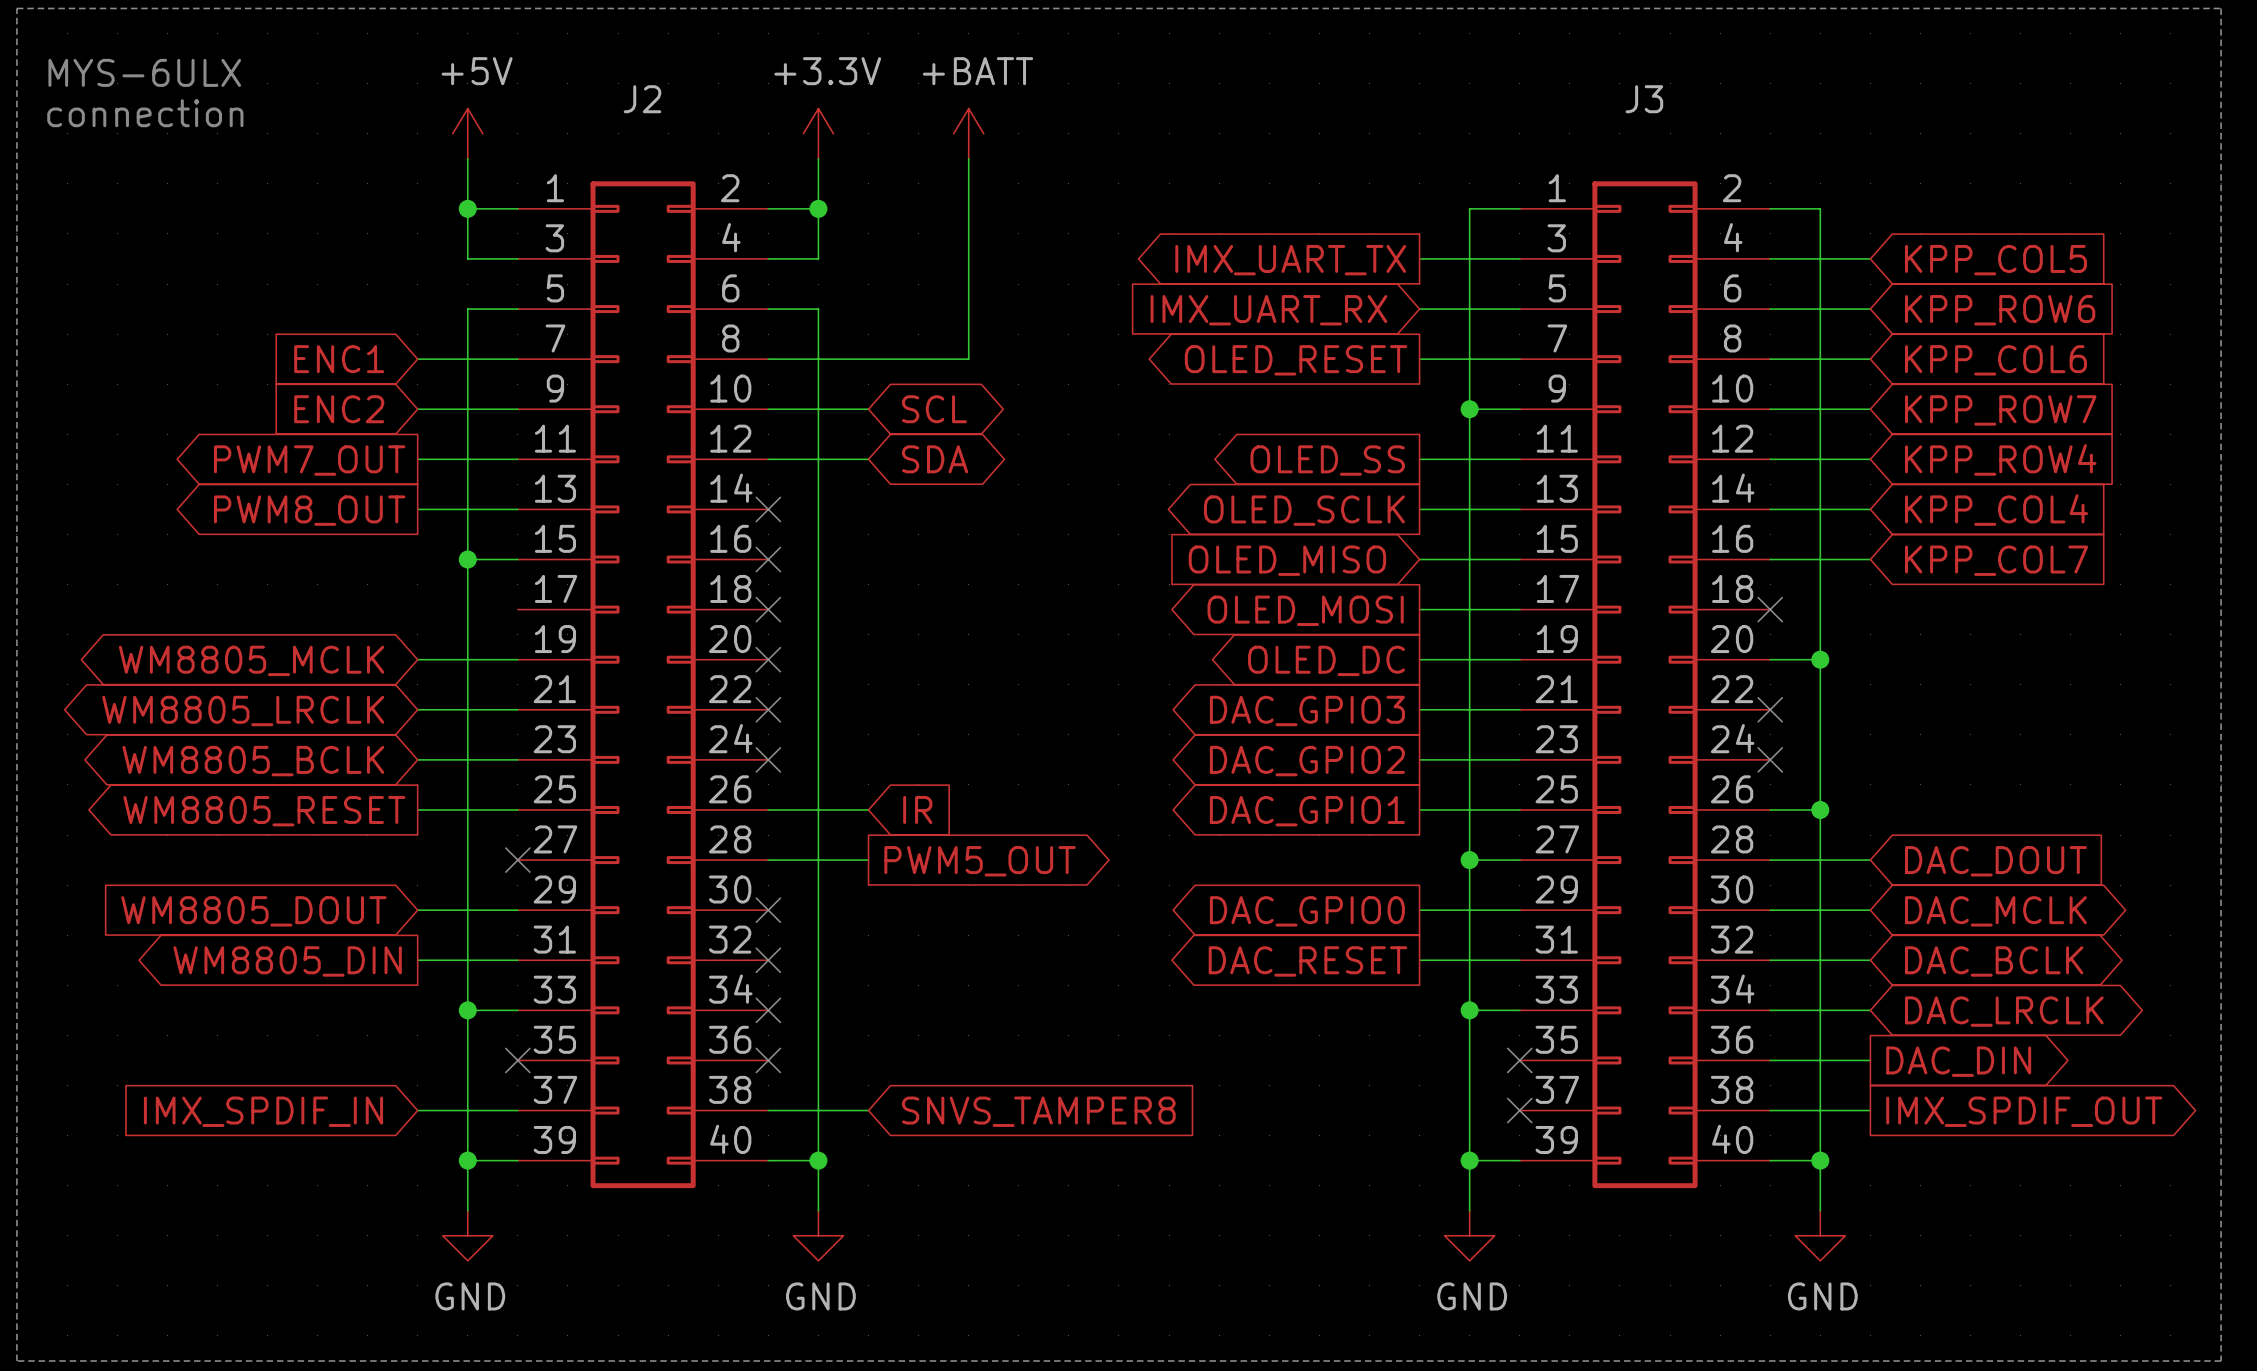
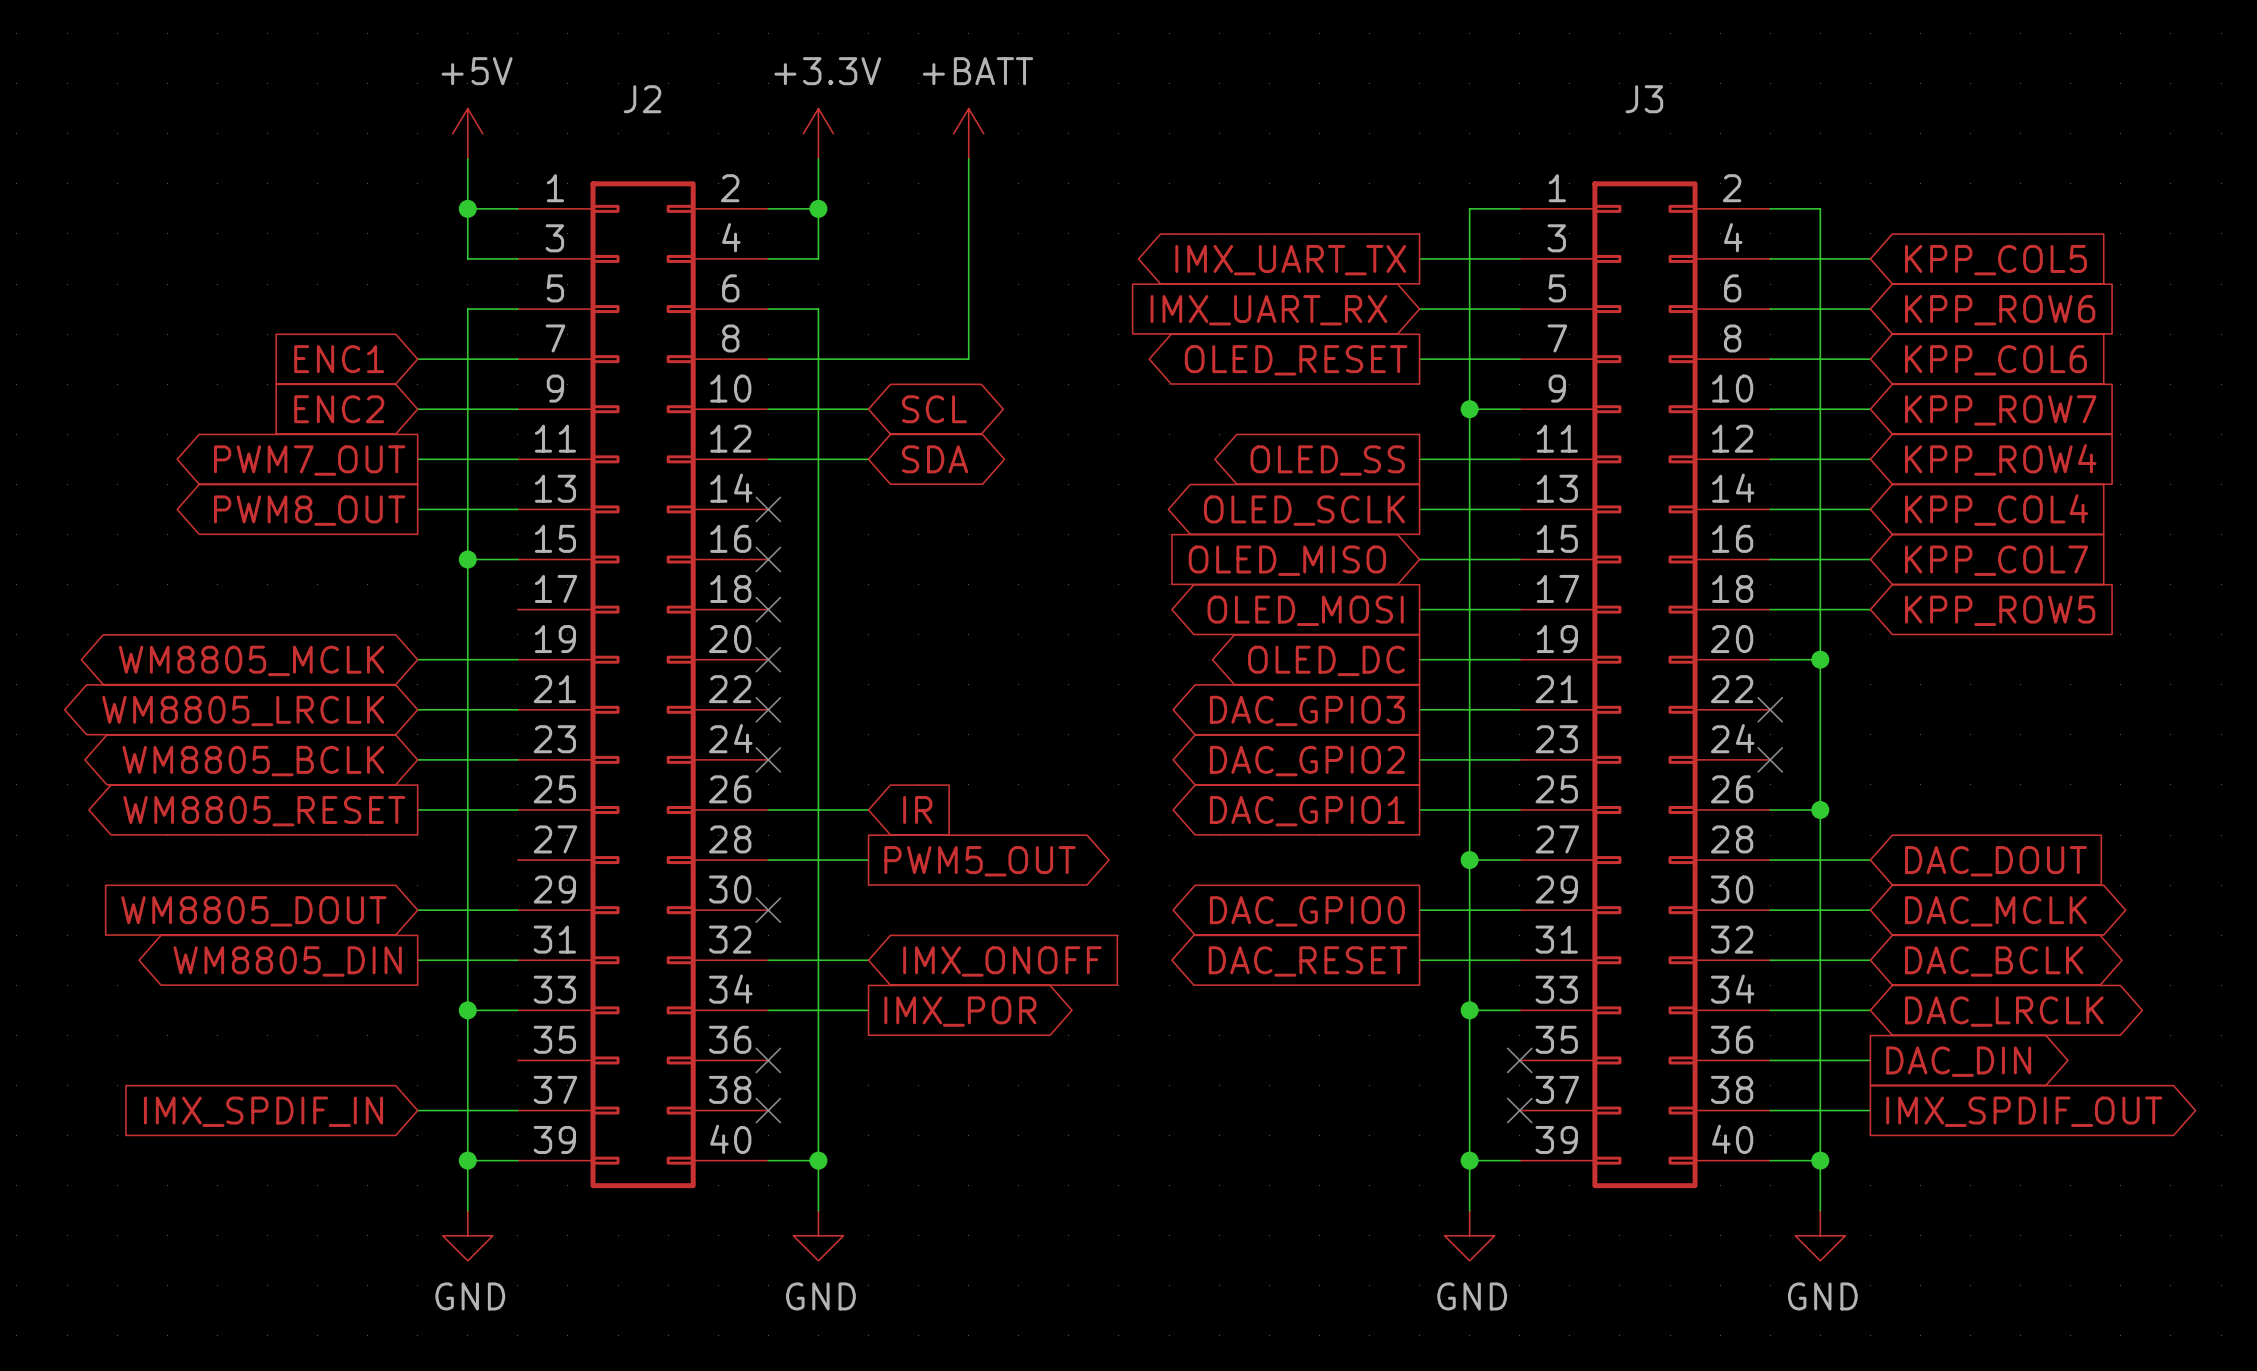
line: (16, 8) (16, 1361) (2221, 1361) (2221, 8) (16, 8) -> none
text: MYS-6ULX (144, 72) -> none
text: connection (145, 113) -> none
wire: none -> (1770, 609) (1870, 609)
no-connect mark: (1770, 609) -> none
global label: none -> KPP_ROW5 (2000, 610)
no-connect mark: (517, 860) -> none
wire: none -> (768, 960) (868, 960)
no-connect mark: (768, 960) -> none
global label: none -> IMX_ONOFF (1002, 961)
no-connect mark: (768, 1010) -> none
global label: none -> IMX_POR (960, 1011)
no-connect mark: (517, 1060) -> none
wire: (768, 1110) (868, 1110) -> (768, 1010) (868, 1010)
no-connect mark: none -> (768, 1110)
global label: SNVS_TAMPER8 (1038, 1111) -> none

